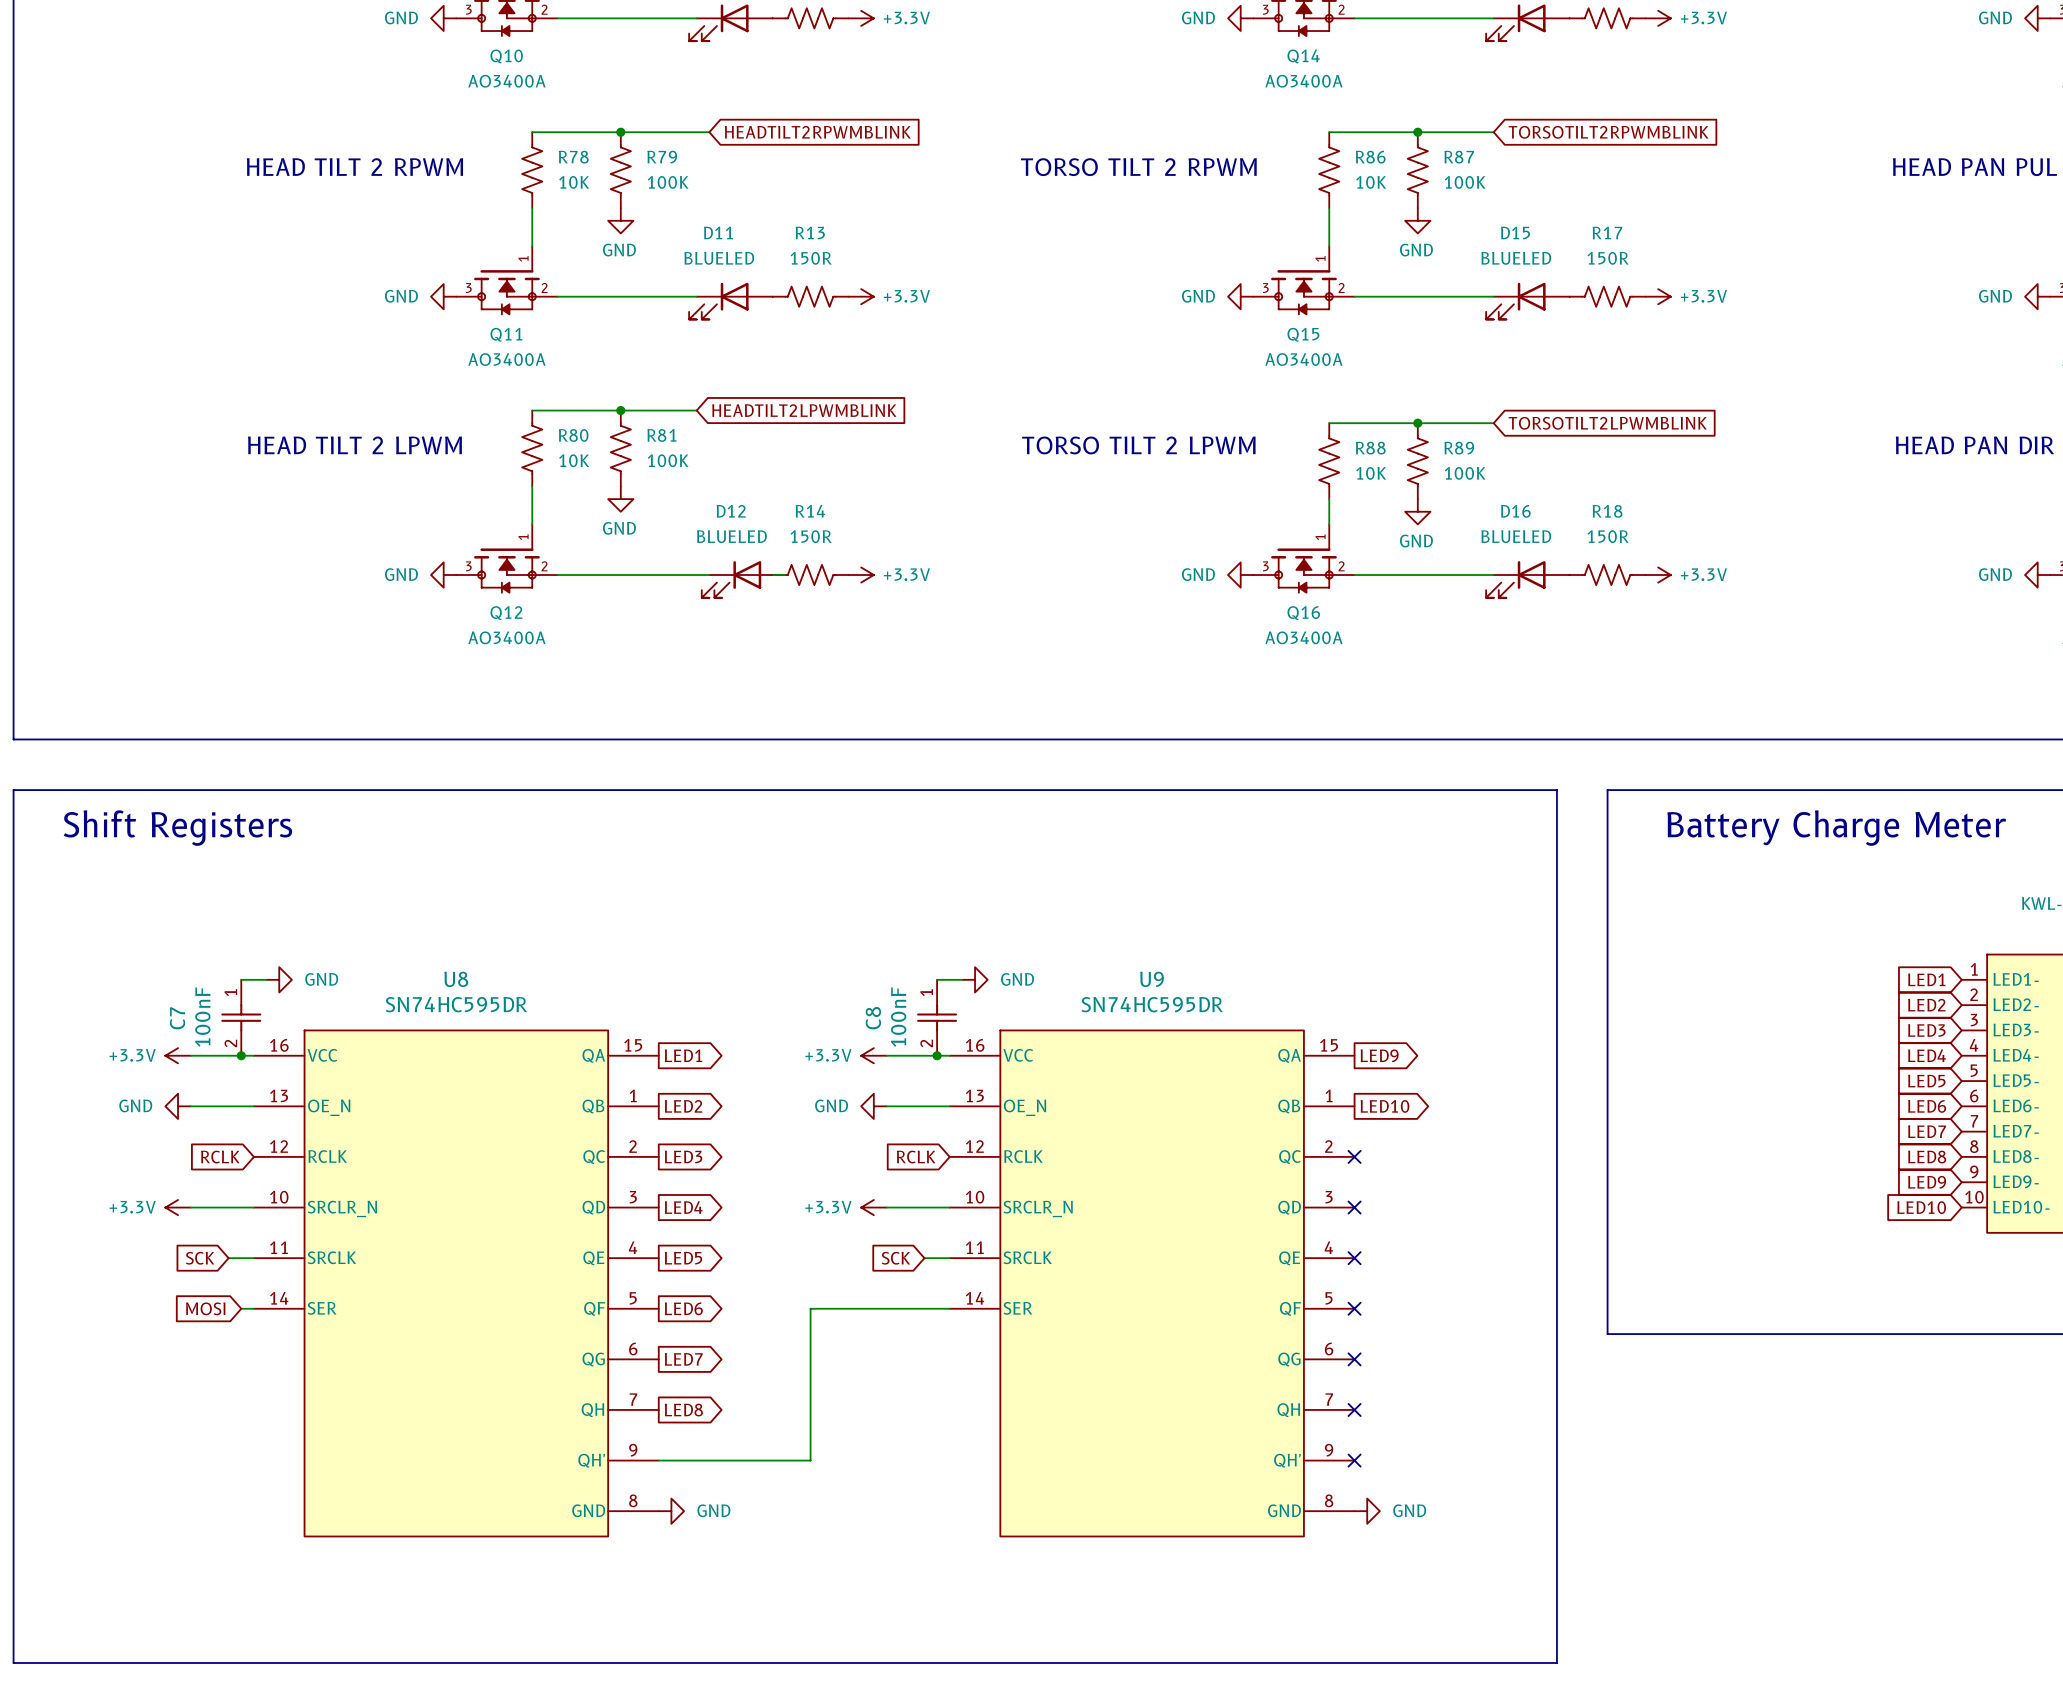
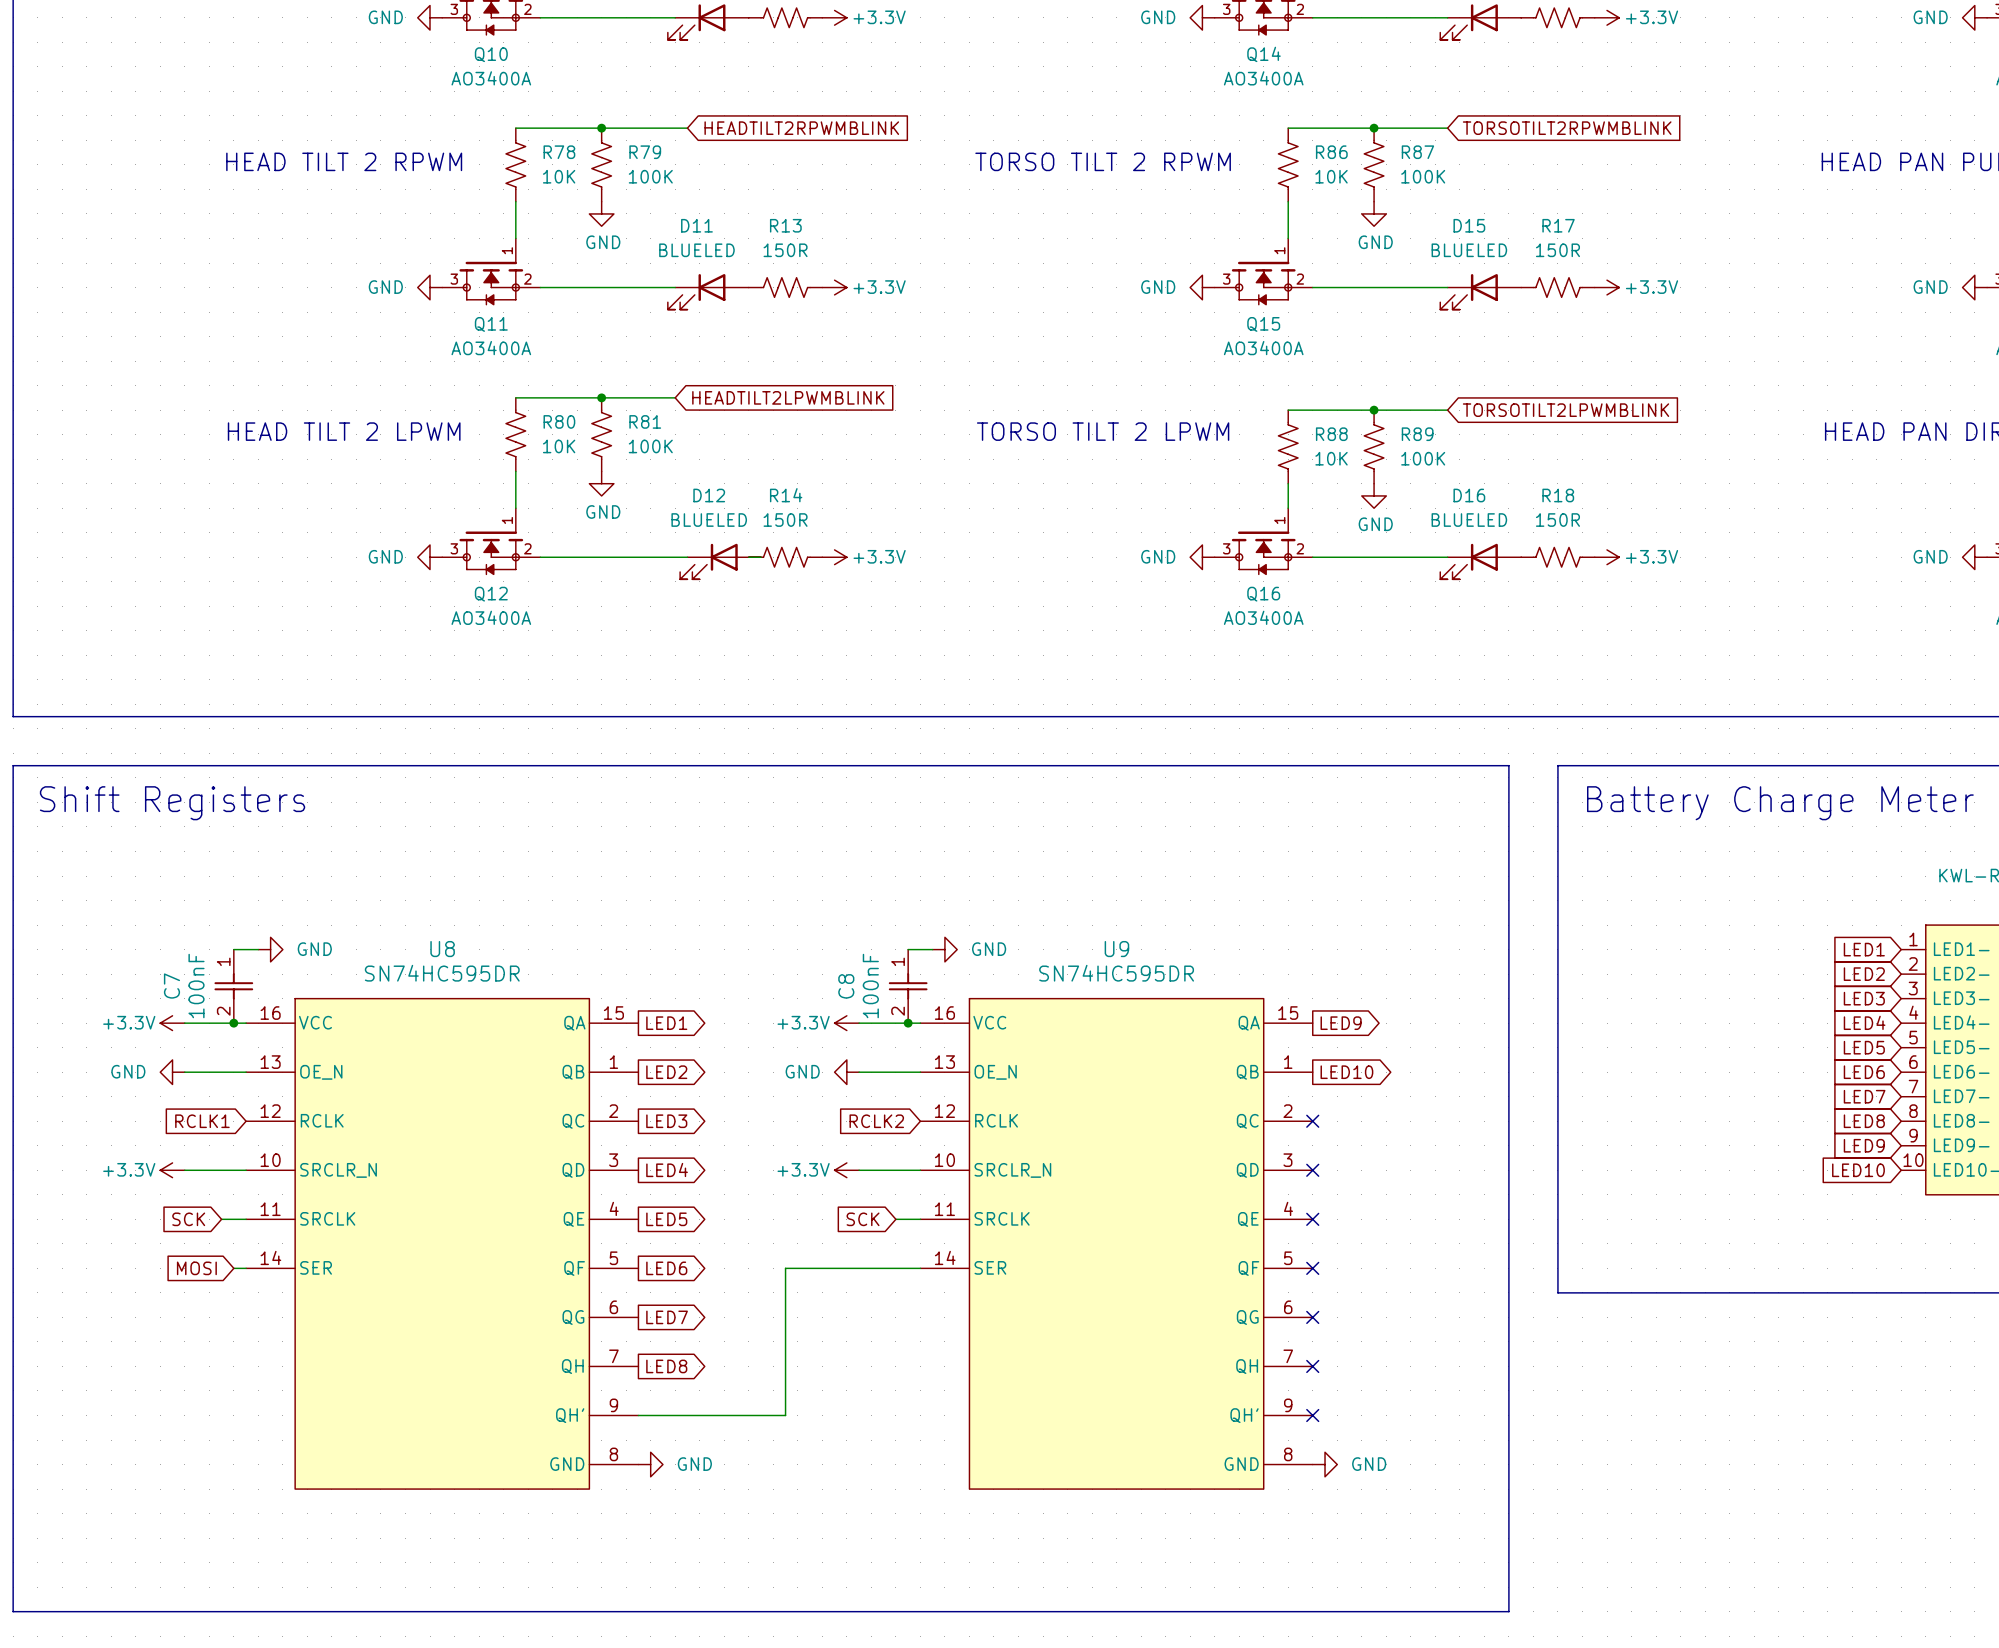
global label: RCLK (220, 1157) -> RCLK1 (202, 1121)
global label: RCLK (916, 1157) -> RCLK2 (876, 1121)

